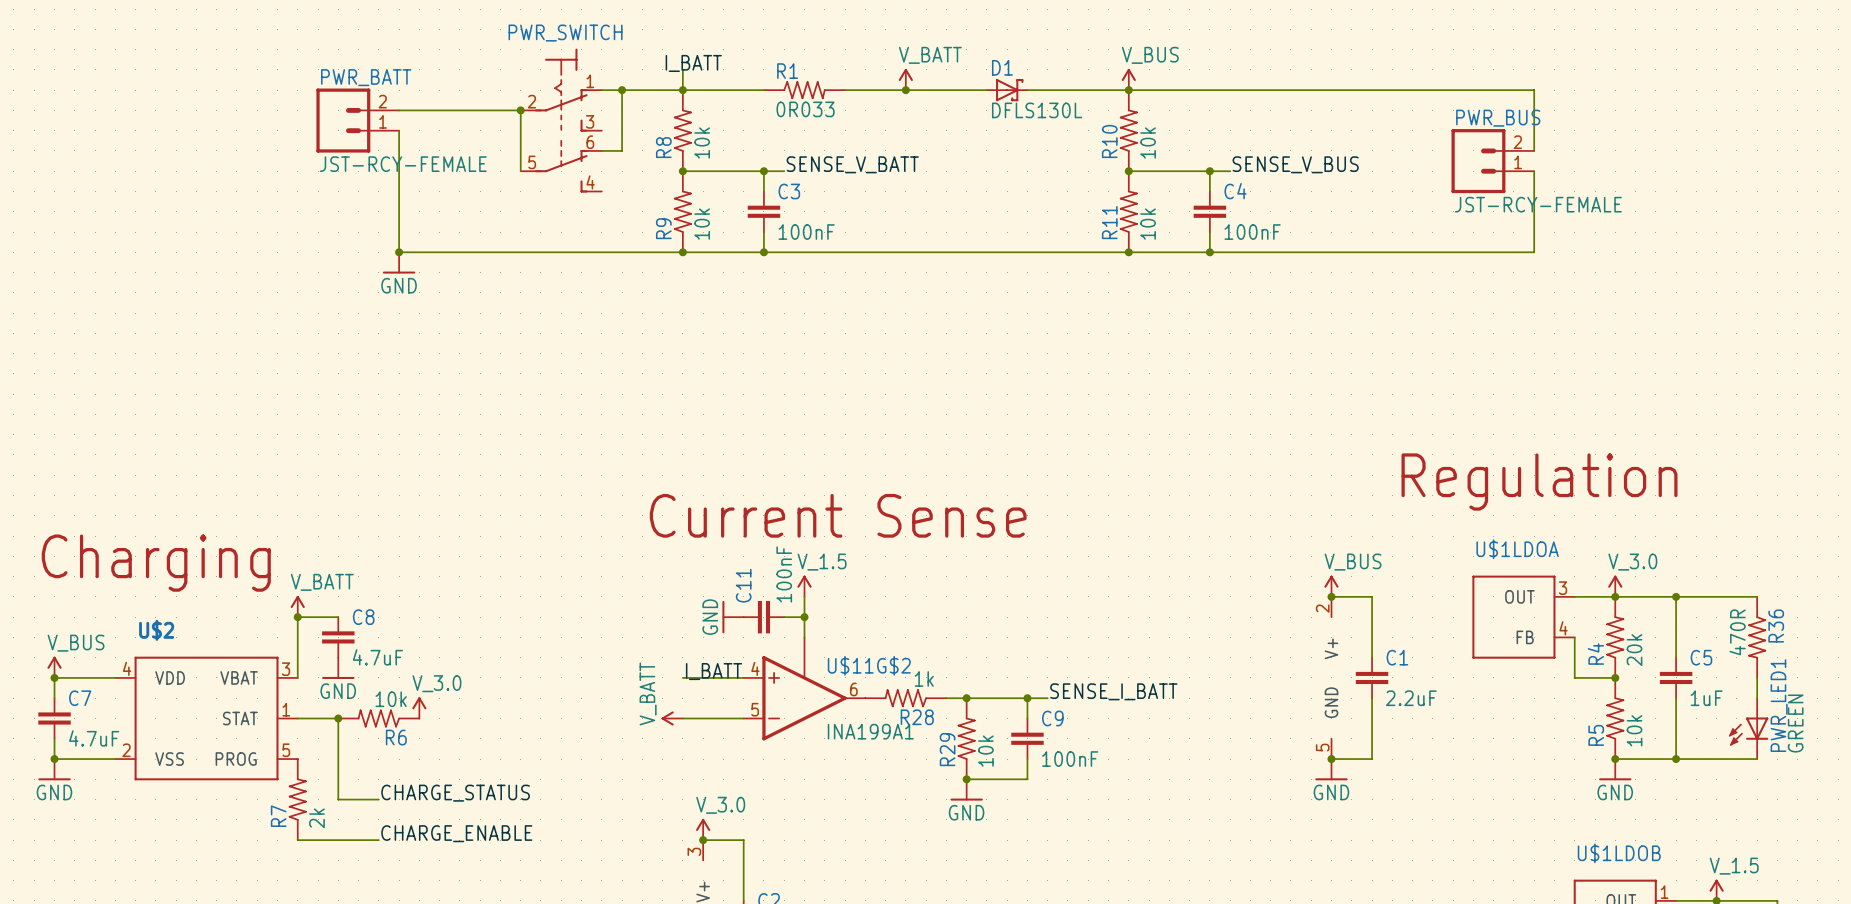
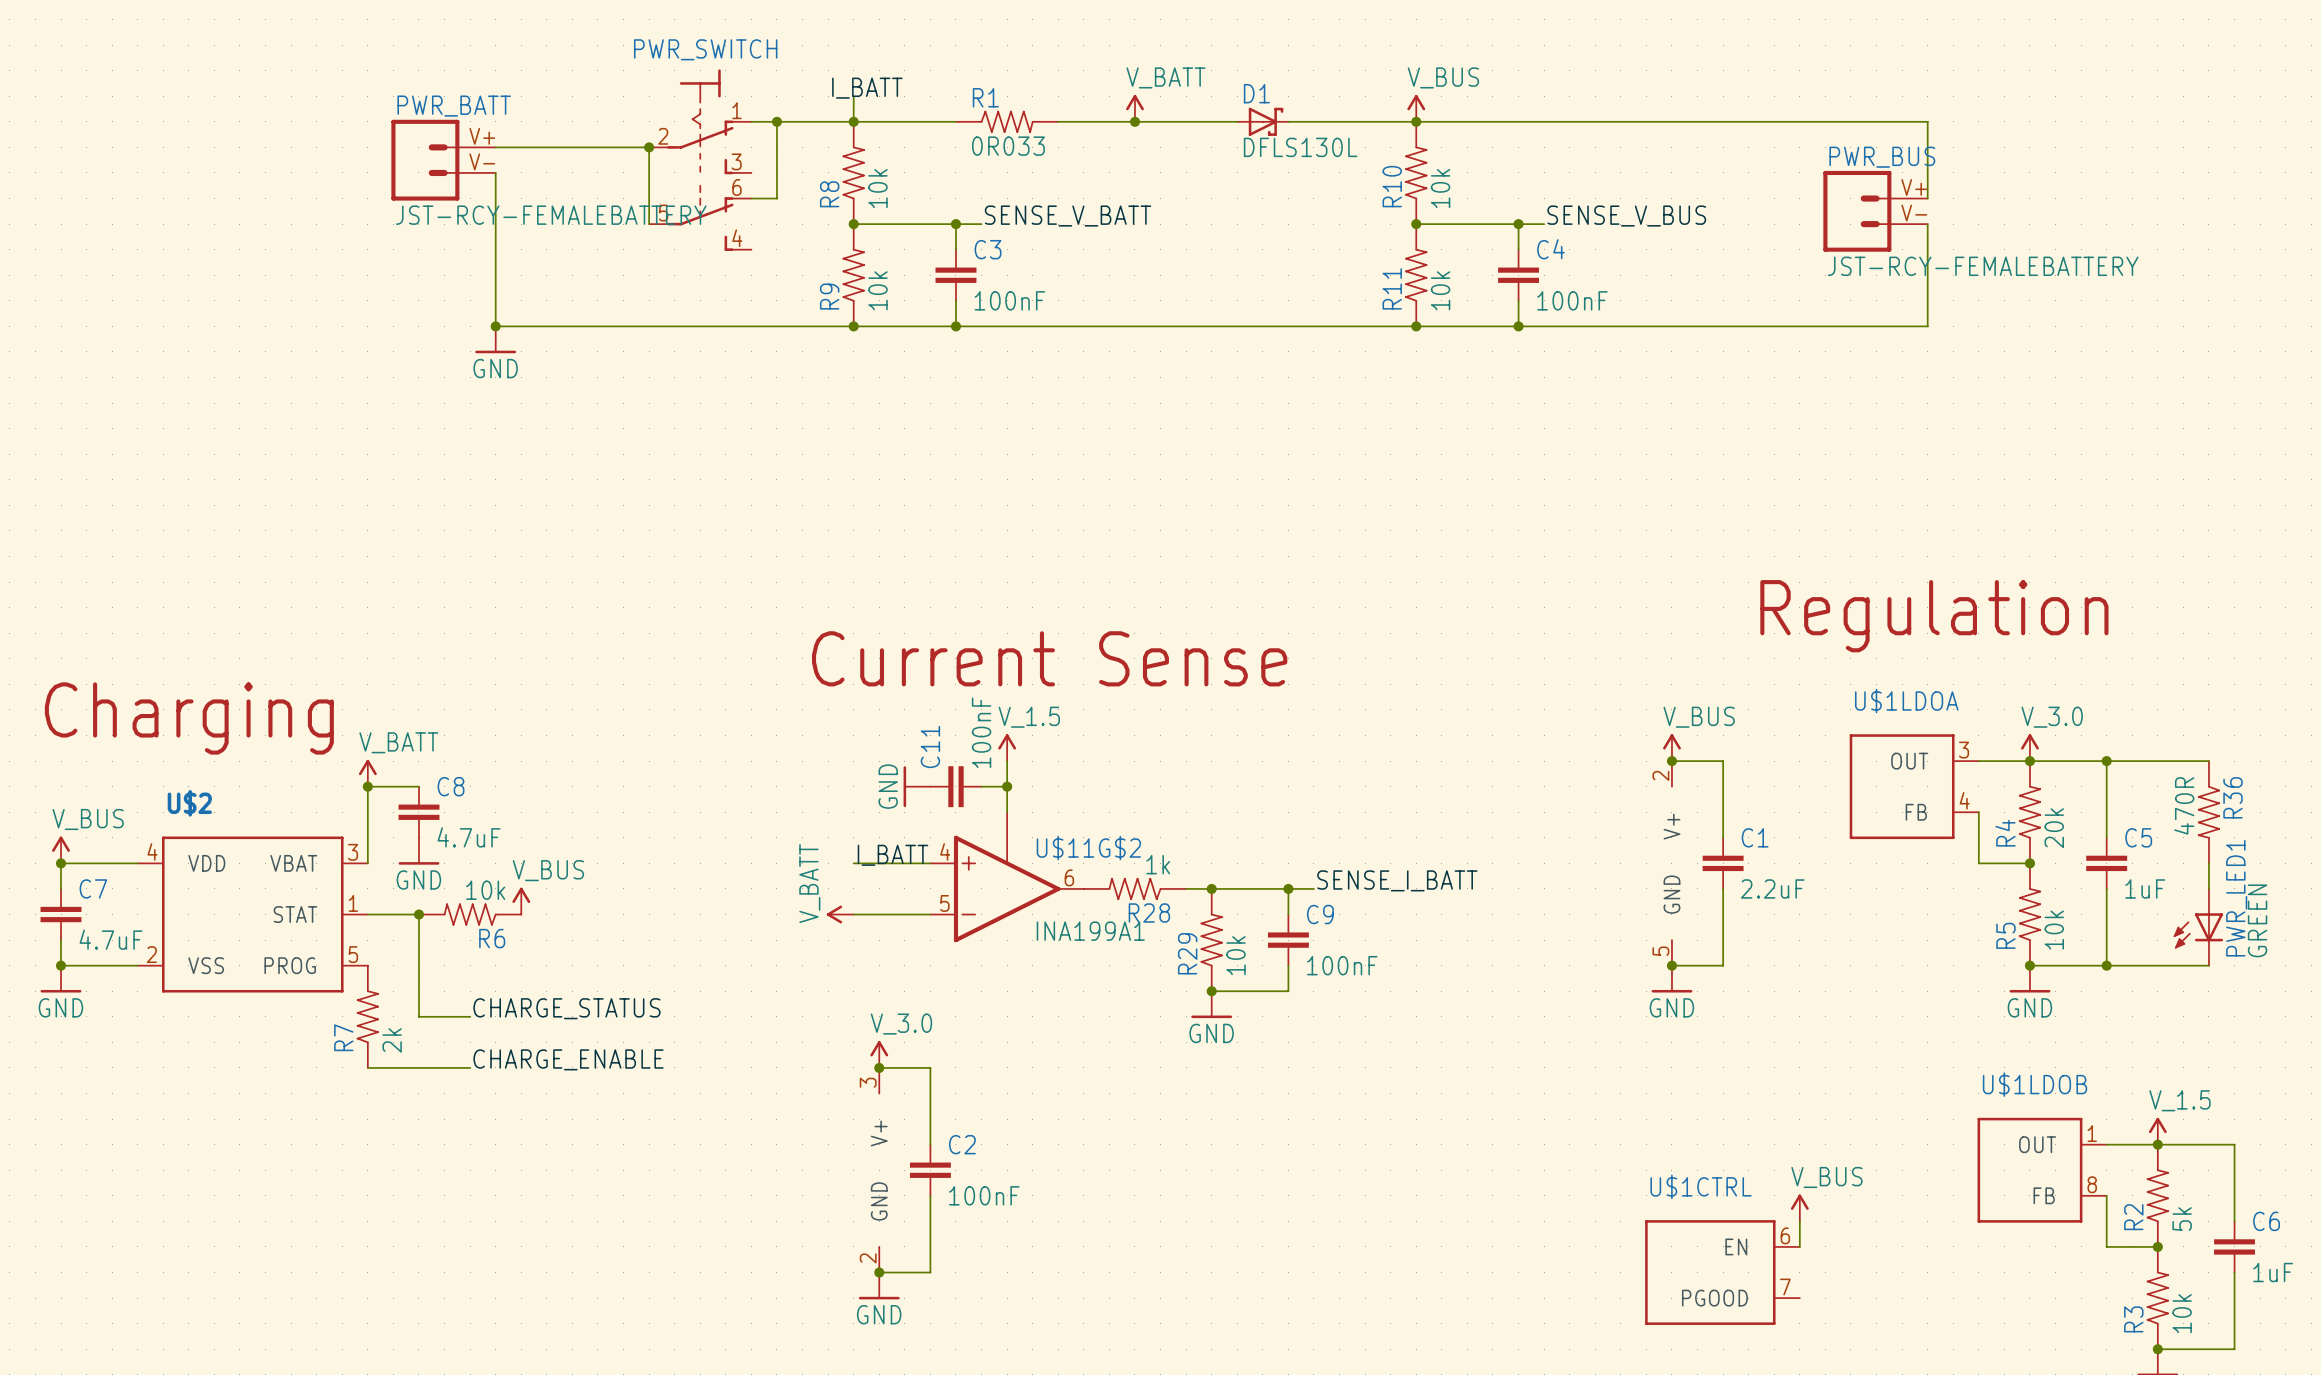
PWR_BATT pin number: 2 (382, 101) -> V+ (482, 136)
PWR_BATT pin number: 1 (383, 121) -> V- (482, 161)
PWR_BUS pin number: 2 (1517, 142) -> V+ (1914, 187)
PWR_BUS pin number: 1 (1518, 162) -> V- (1914, 213)
PWR_BATT value: JST-RCY-FEMALE (403, 164) -> JST-RCY-FEMALEBATTERY (551, 215)
PWR_BUS value: JST-RCY-FEMALE (1538, 204) -> JST-RCY-FEMALEBATTERY (1983, 266)
power symbol: V_3.0 (419, 707) -> V_BUS (521, 901)

